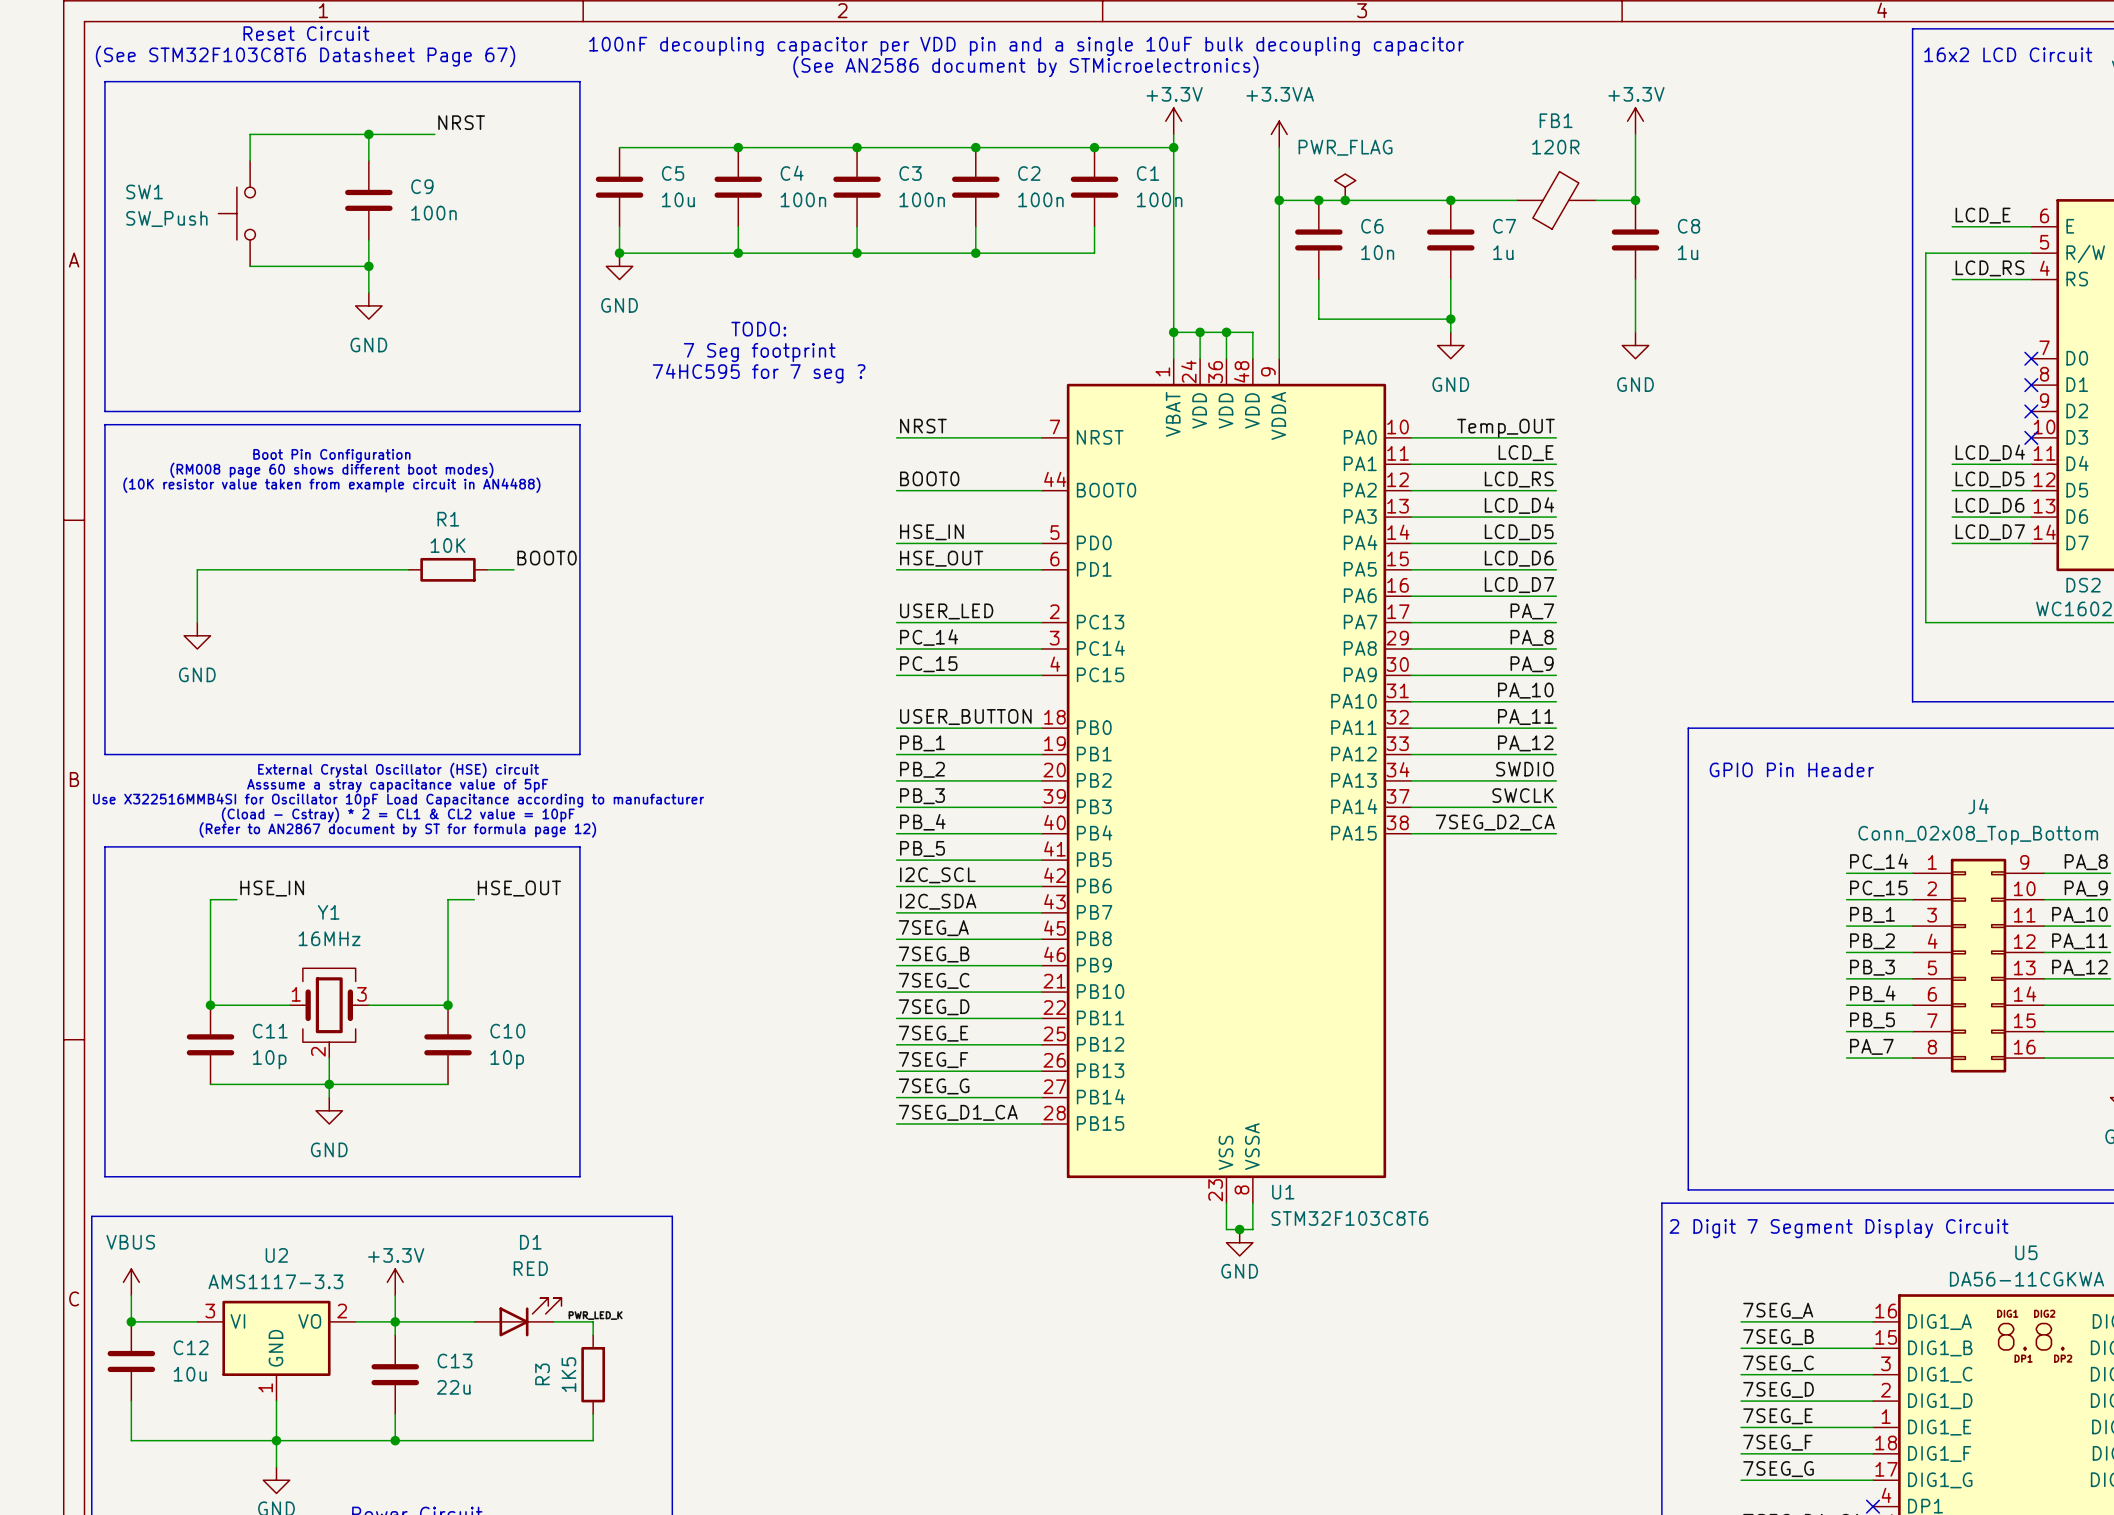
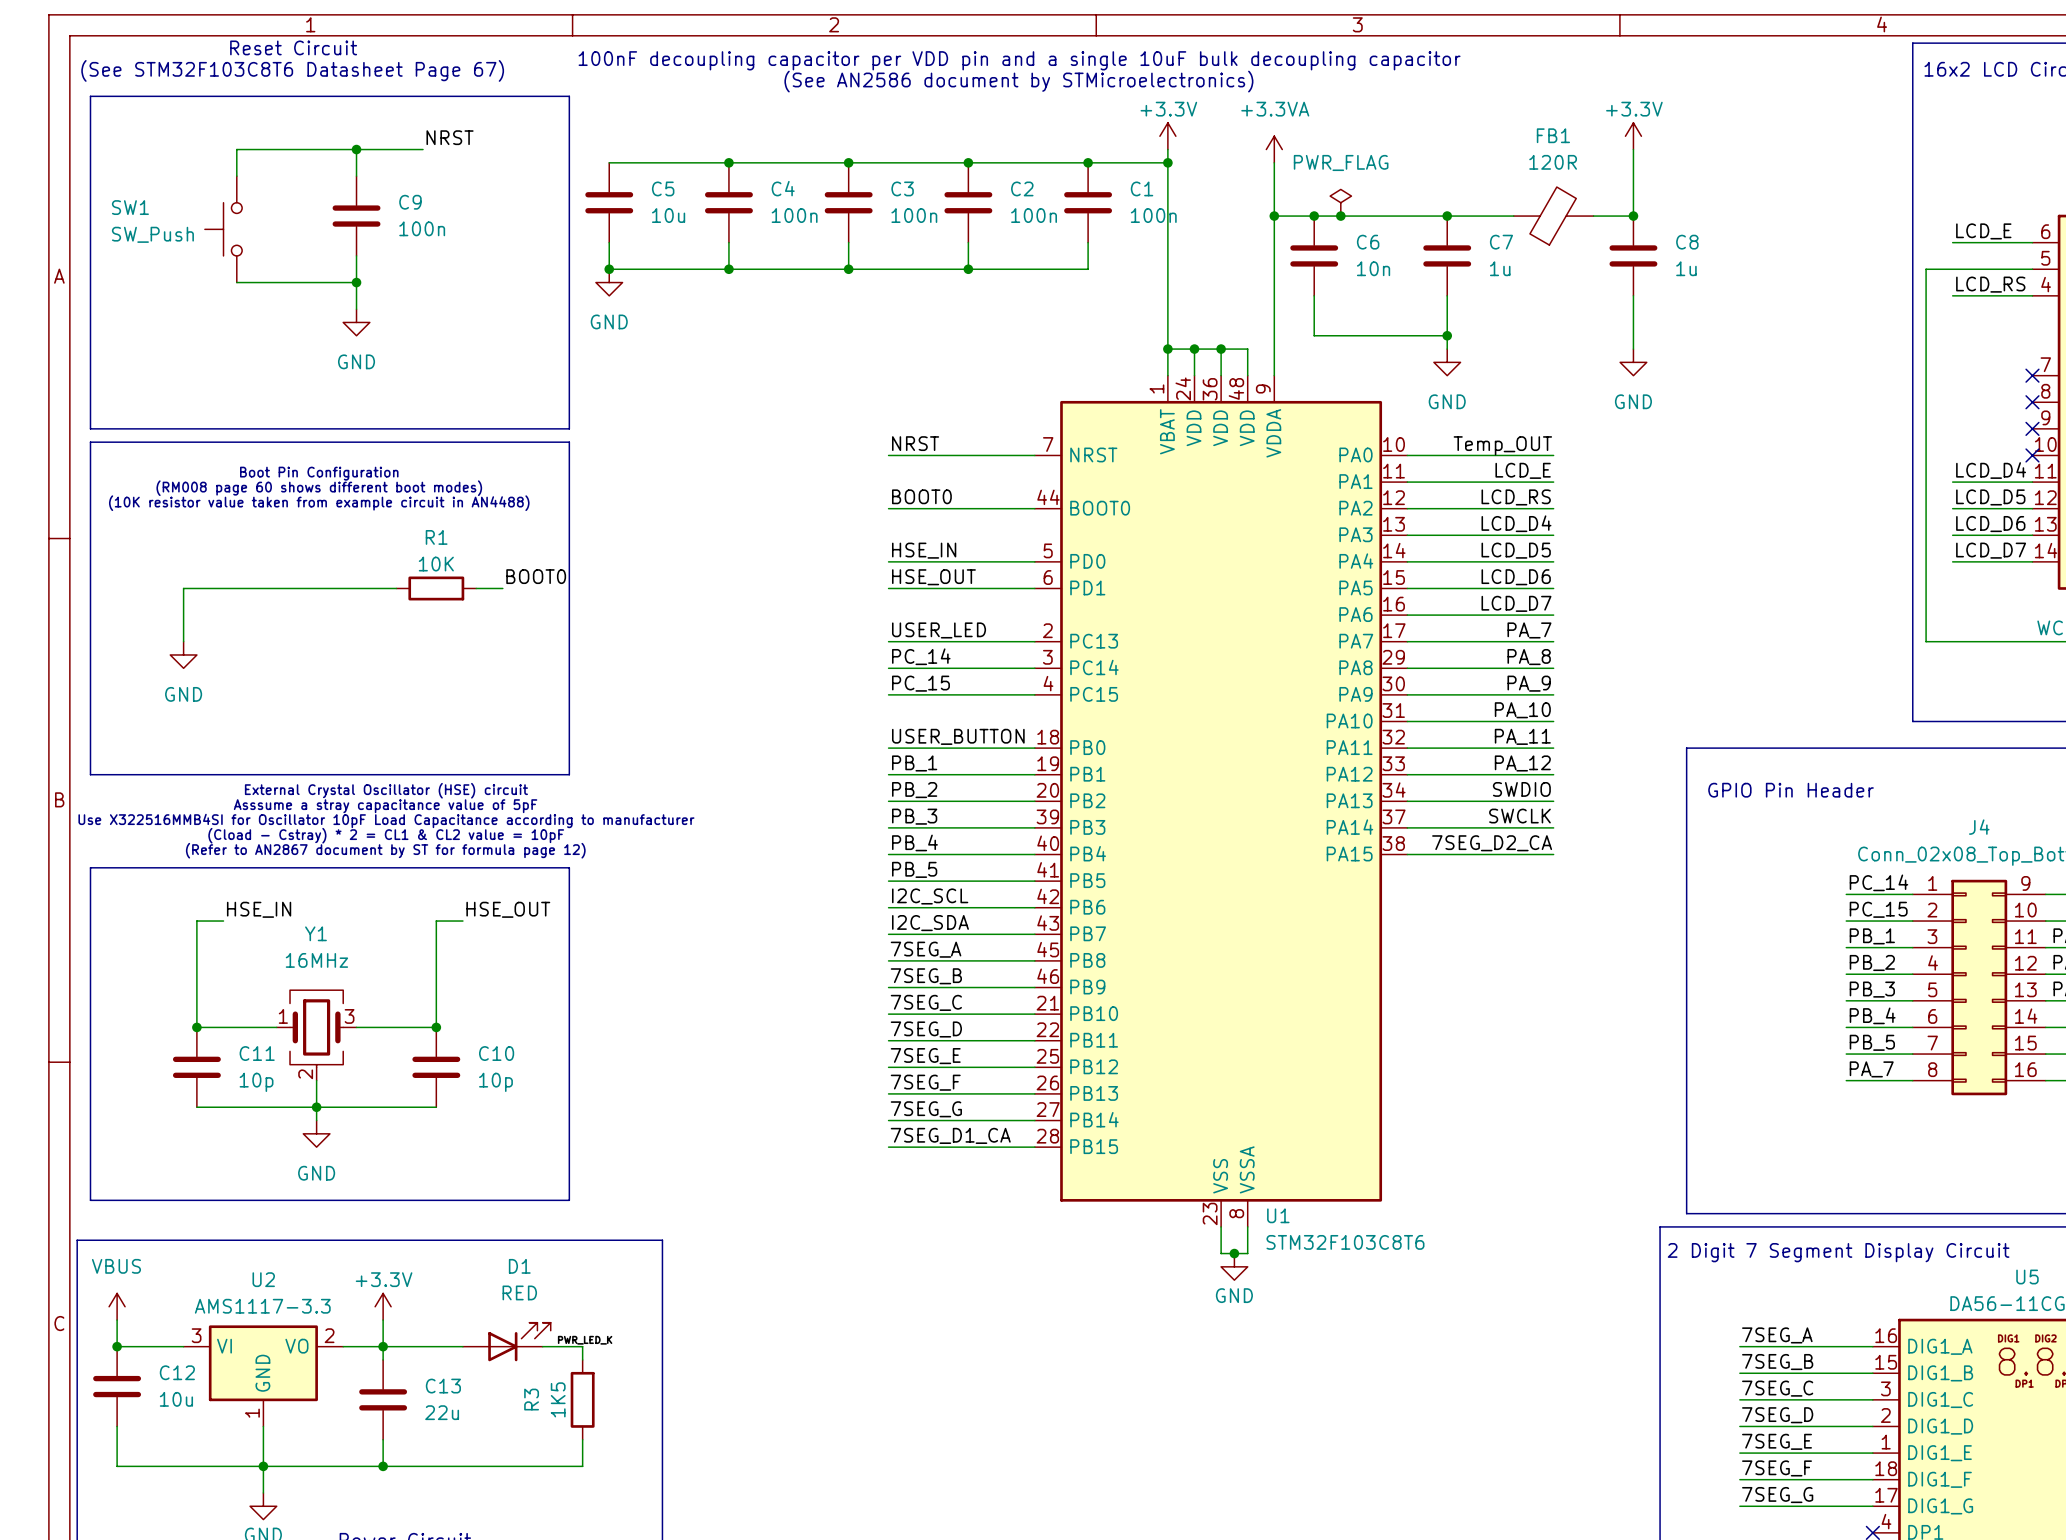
text: TODO: (758, 329) -> none
text: 7 Seg footprint (759, 352) -> none
text: 74HC595 for 7 seg ? (759, 373) -> none

